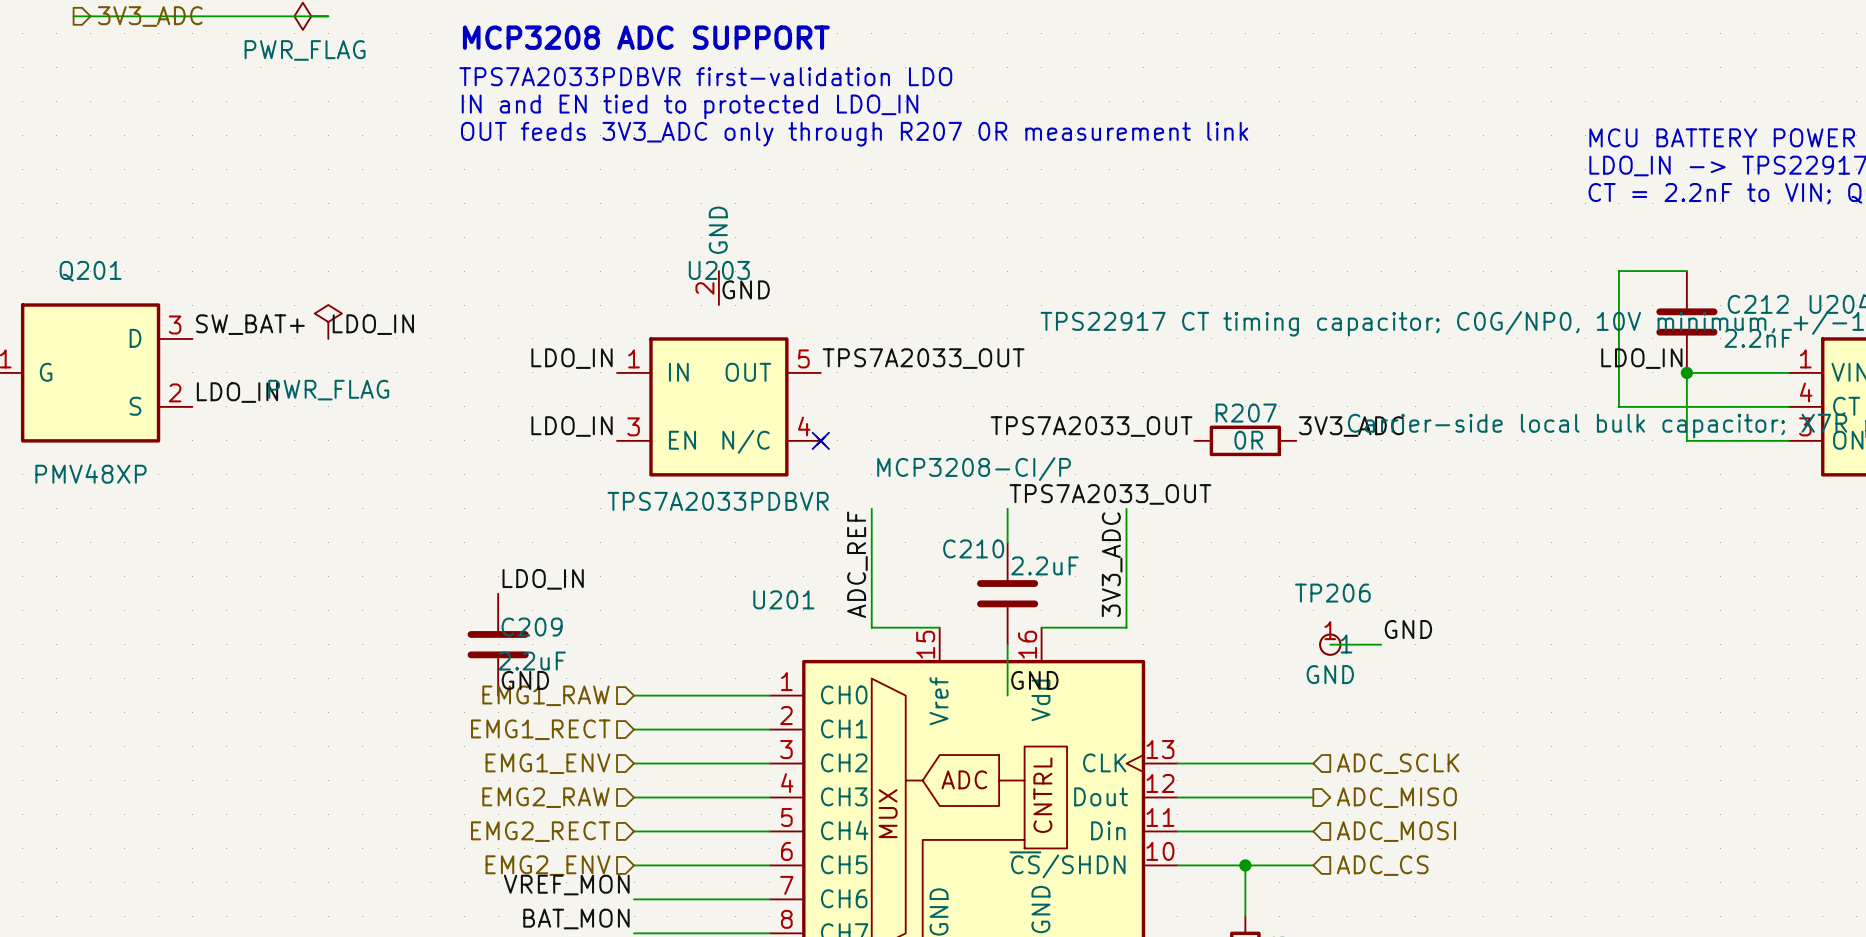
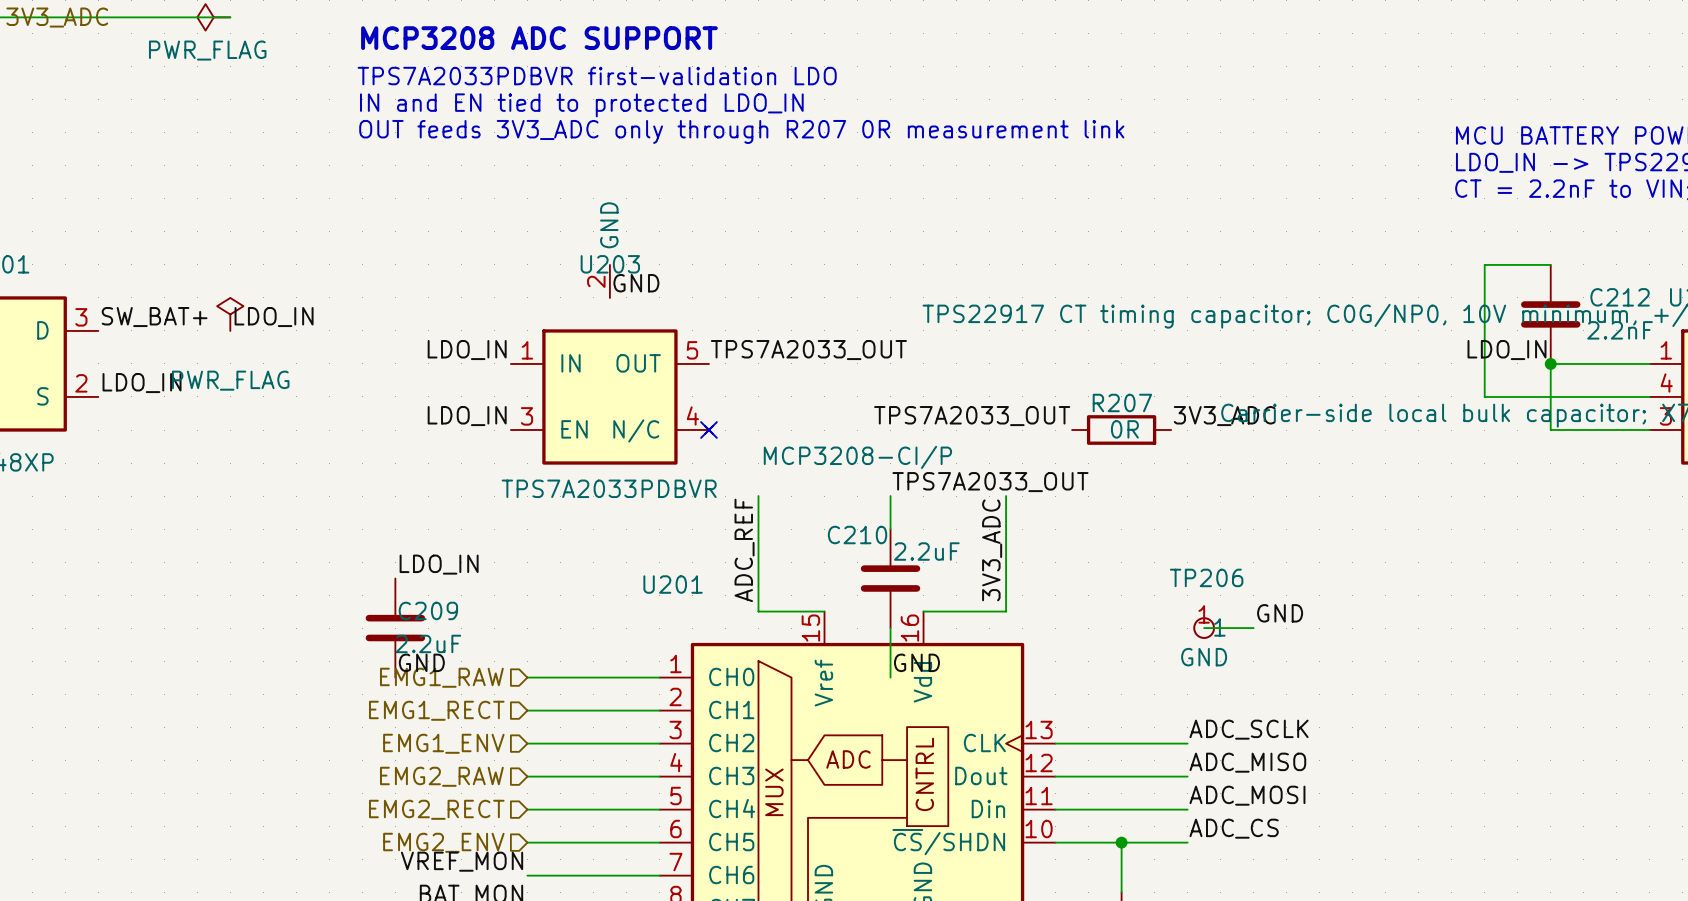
label: none -> ADC_SCLK (1249, 729)
hierarchical label: ADC_SCLK (1398, 763) -> none
label: none -> ADC_MISO (1247, 762)
hierarchical label: ADC_MISO (1396, 797) -> none
label: none -> ADC_MOSI (1247, 795)
hierarchical label: ADC_MOSI (1396, 831) -> none
label: none -> ADC_CS (1234, 828)
hierarchical label: ADC_CS (1382, 865) -> none

